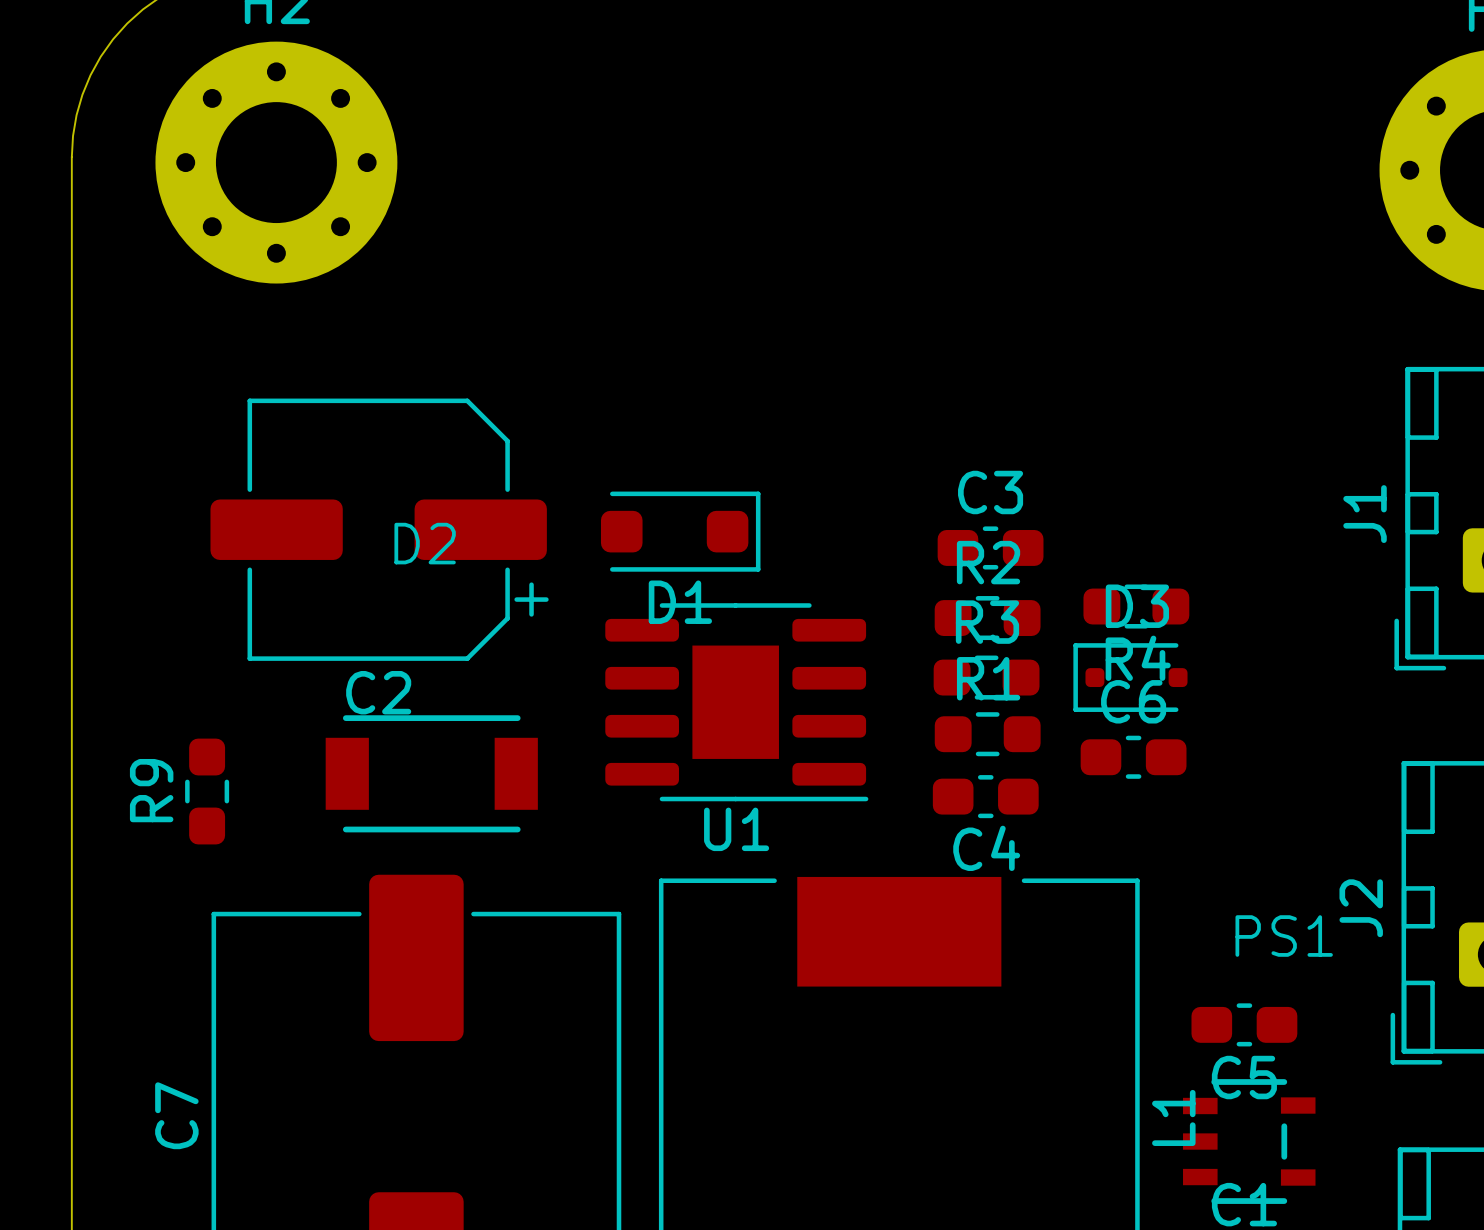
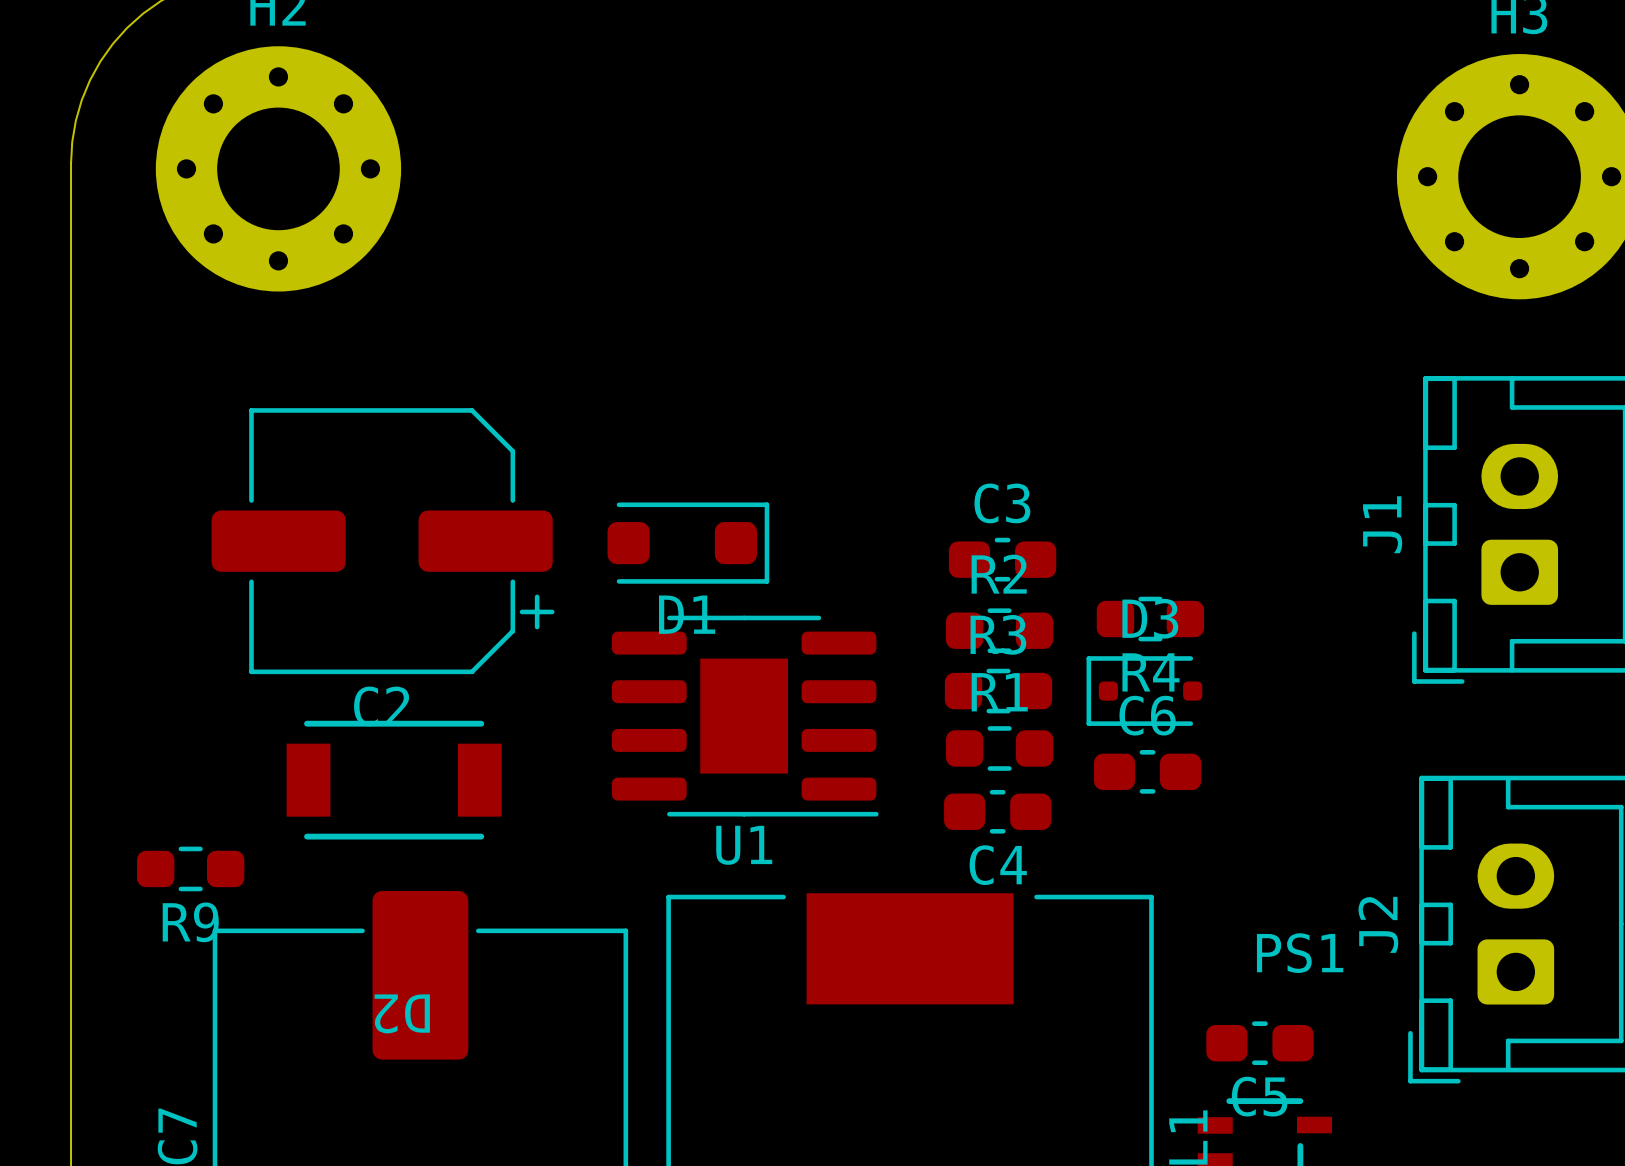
D2 name rotation: 0° (425, 543) -> 180° (402, 1013)
D2 name position: D2 (425, 543) -> D2 (402, 1013)
D2 position: (431, 773) -> (394, 780)
R9 name position: R9 (151, 790) -> R9 (190, 922)
R9 rotation: 0° (207, 791) -> 90° clockwise (190, 868)
R9 position: (207, 791) -> (190, 868)

